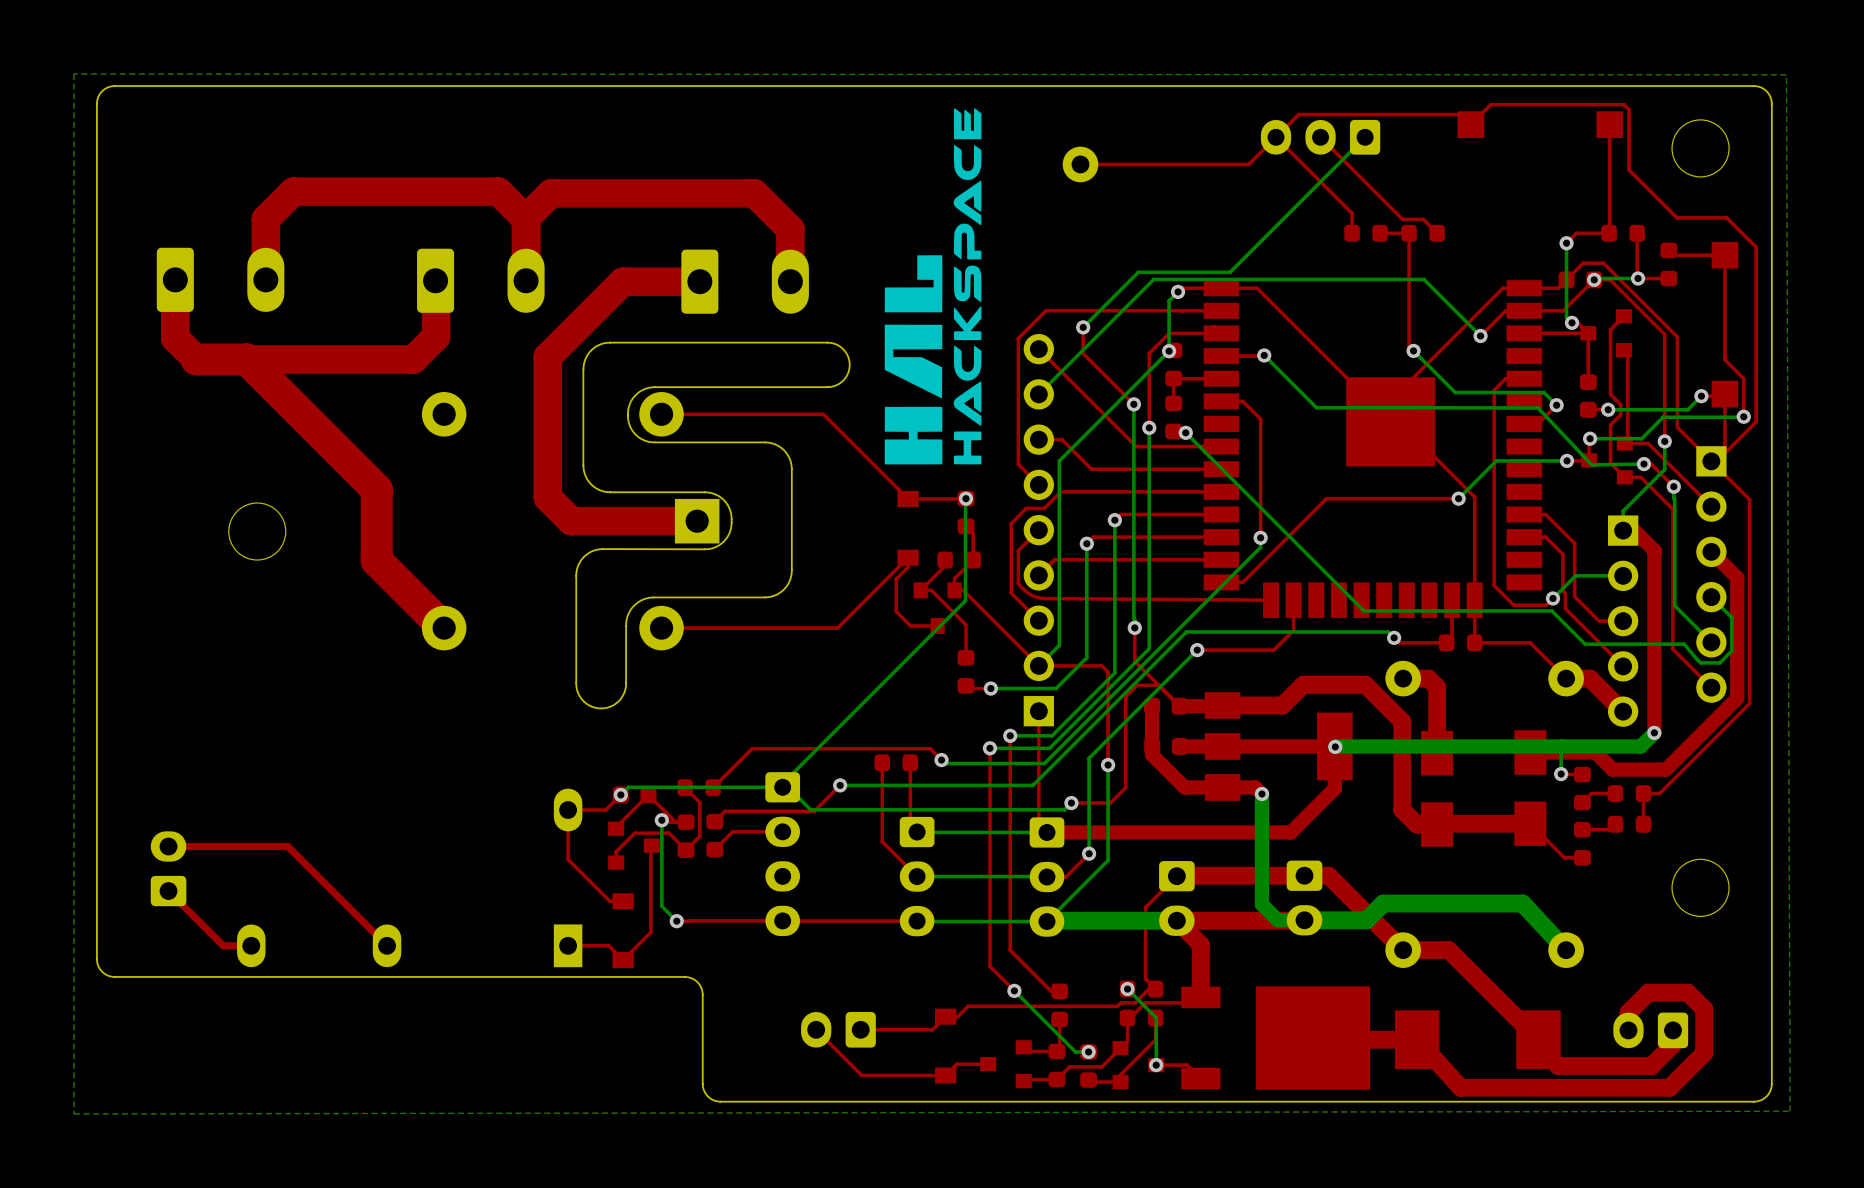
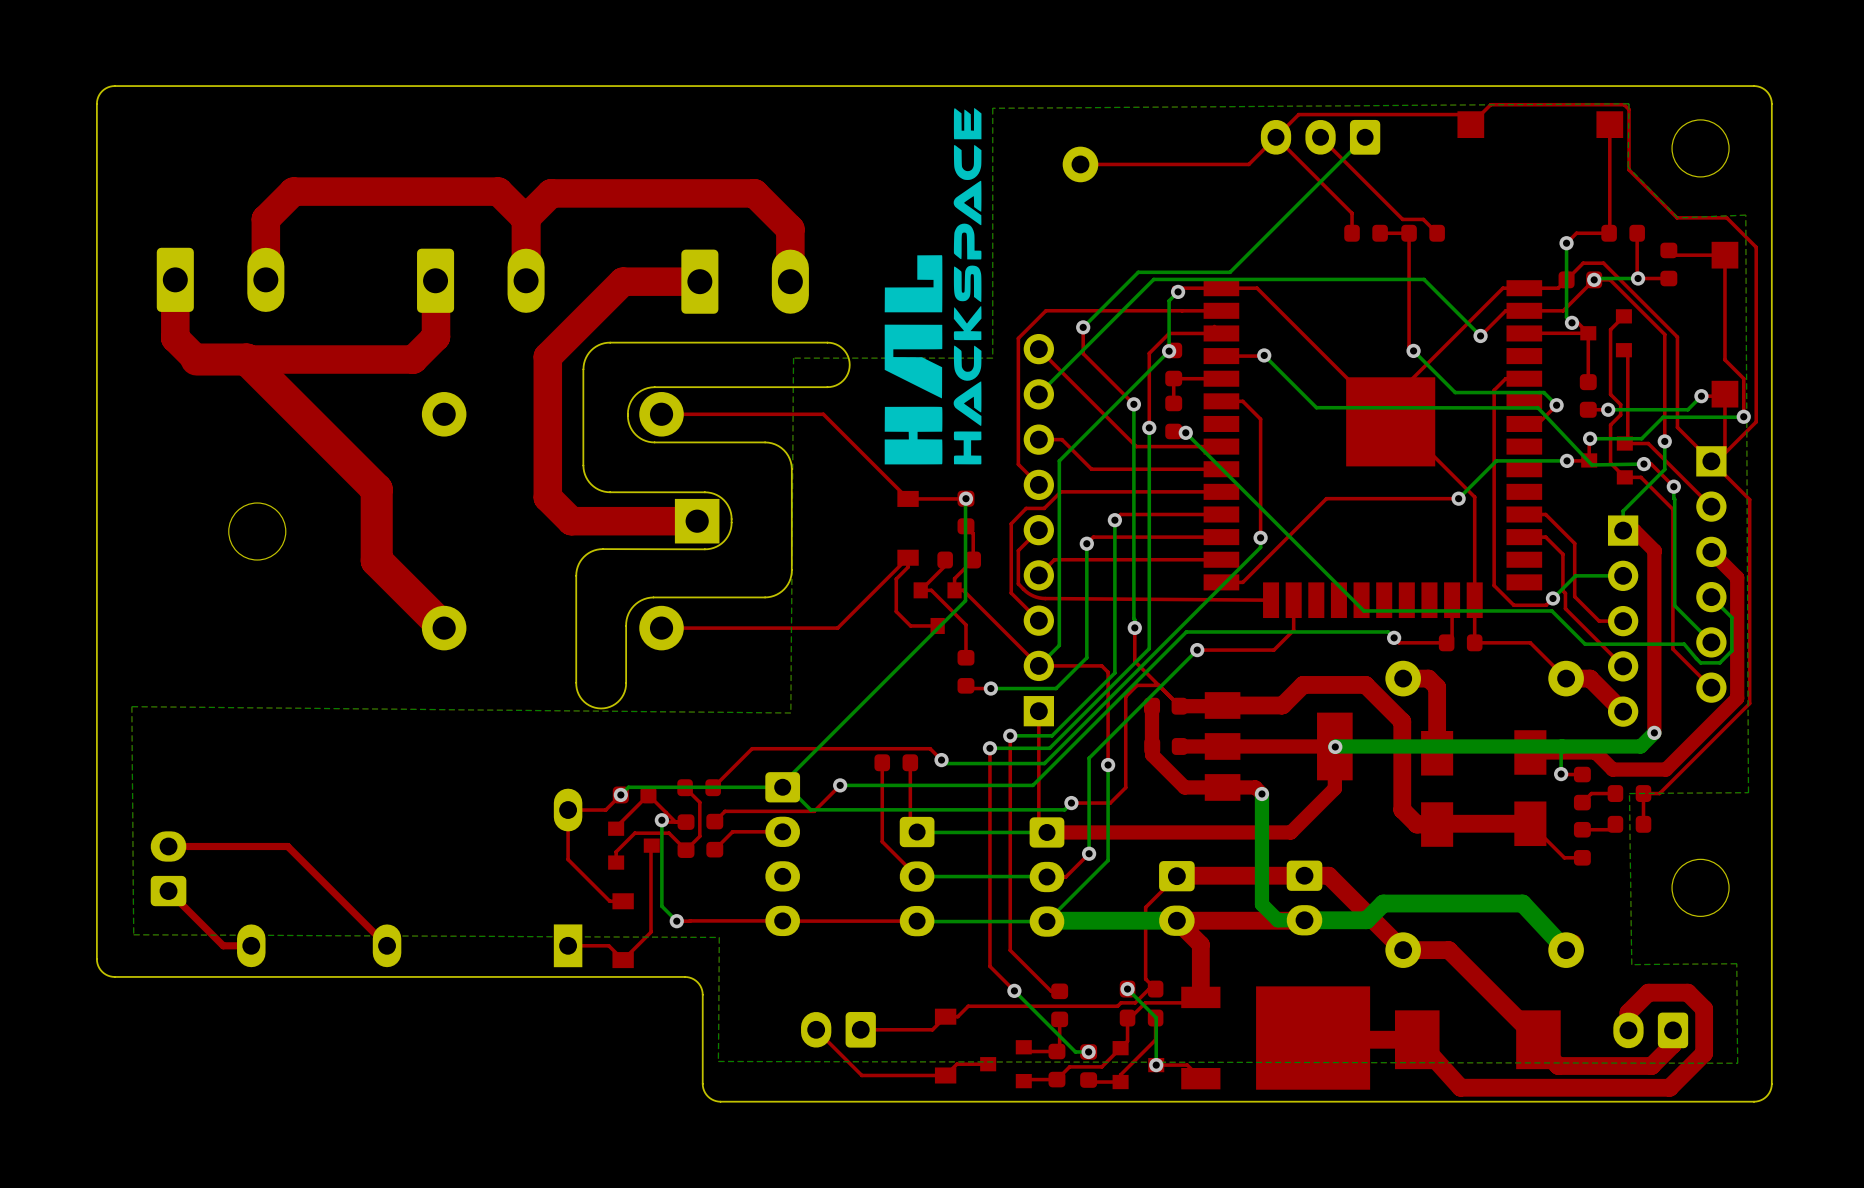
bottom zone outline: (73, 73) (1786, 74) (1790, 1111) (73, 1113) (73, 73) -> (1629, 103) (1628, 167) (1677, 217) (1745, 215) (1748, 792) (1629, 793) (1631, 964) (1736, 963) (1737, 1063) (718, 1061) (719, 937) (133, 934) (131, 706) (790, 712) (793, 358) (992, 358) (992, 108) (1629, 103)

